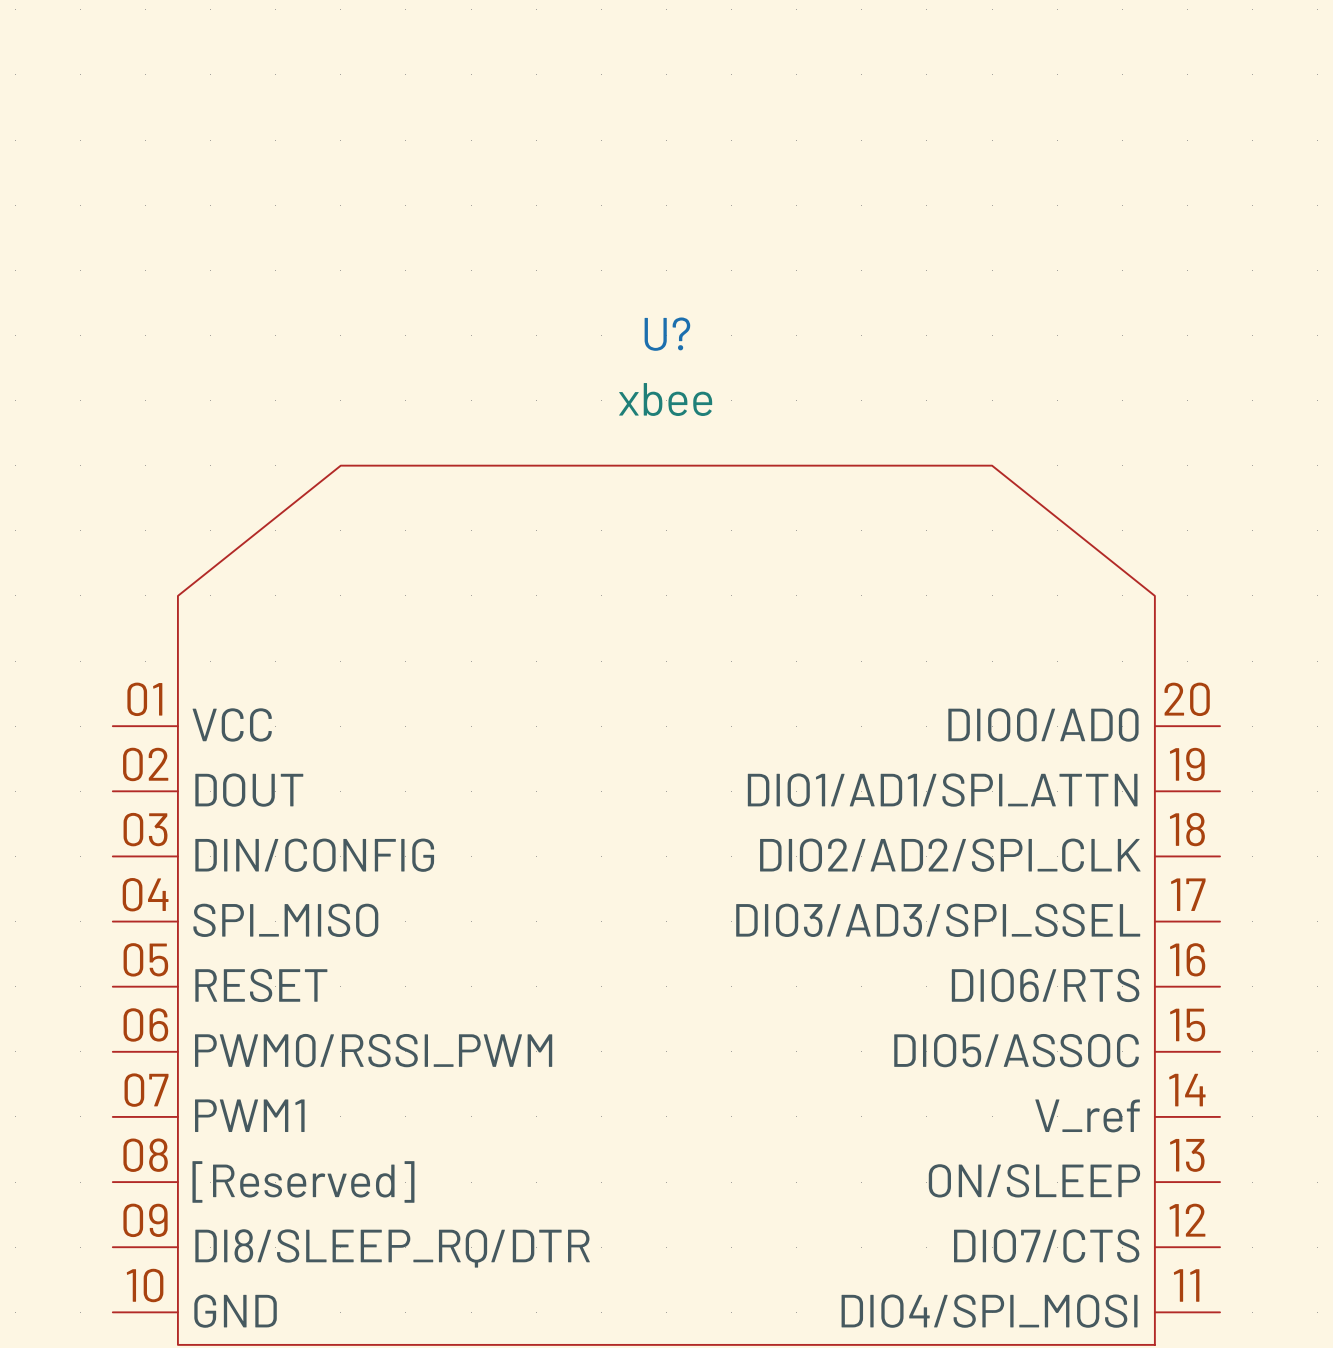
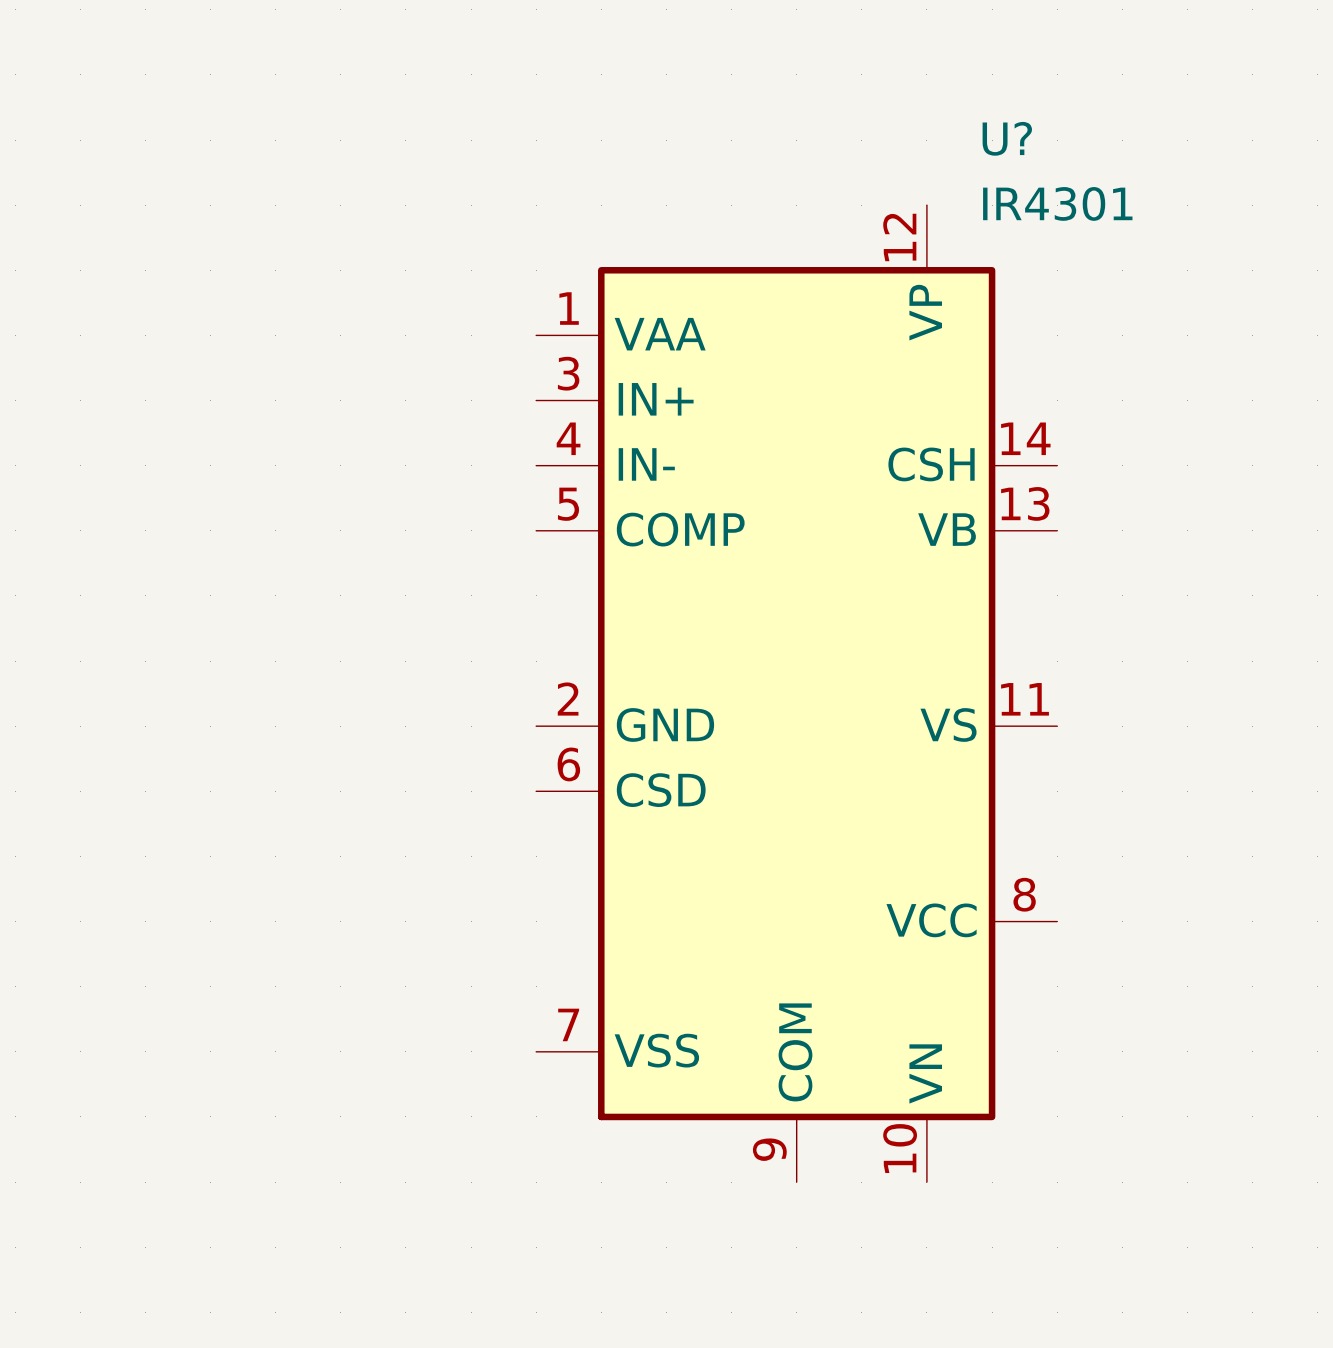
U?: none -> IR4301 (796, 693)
U?: xbee (666, 905) -> none

